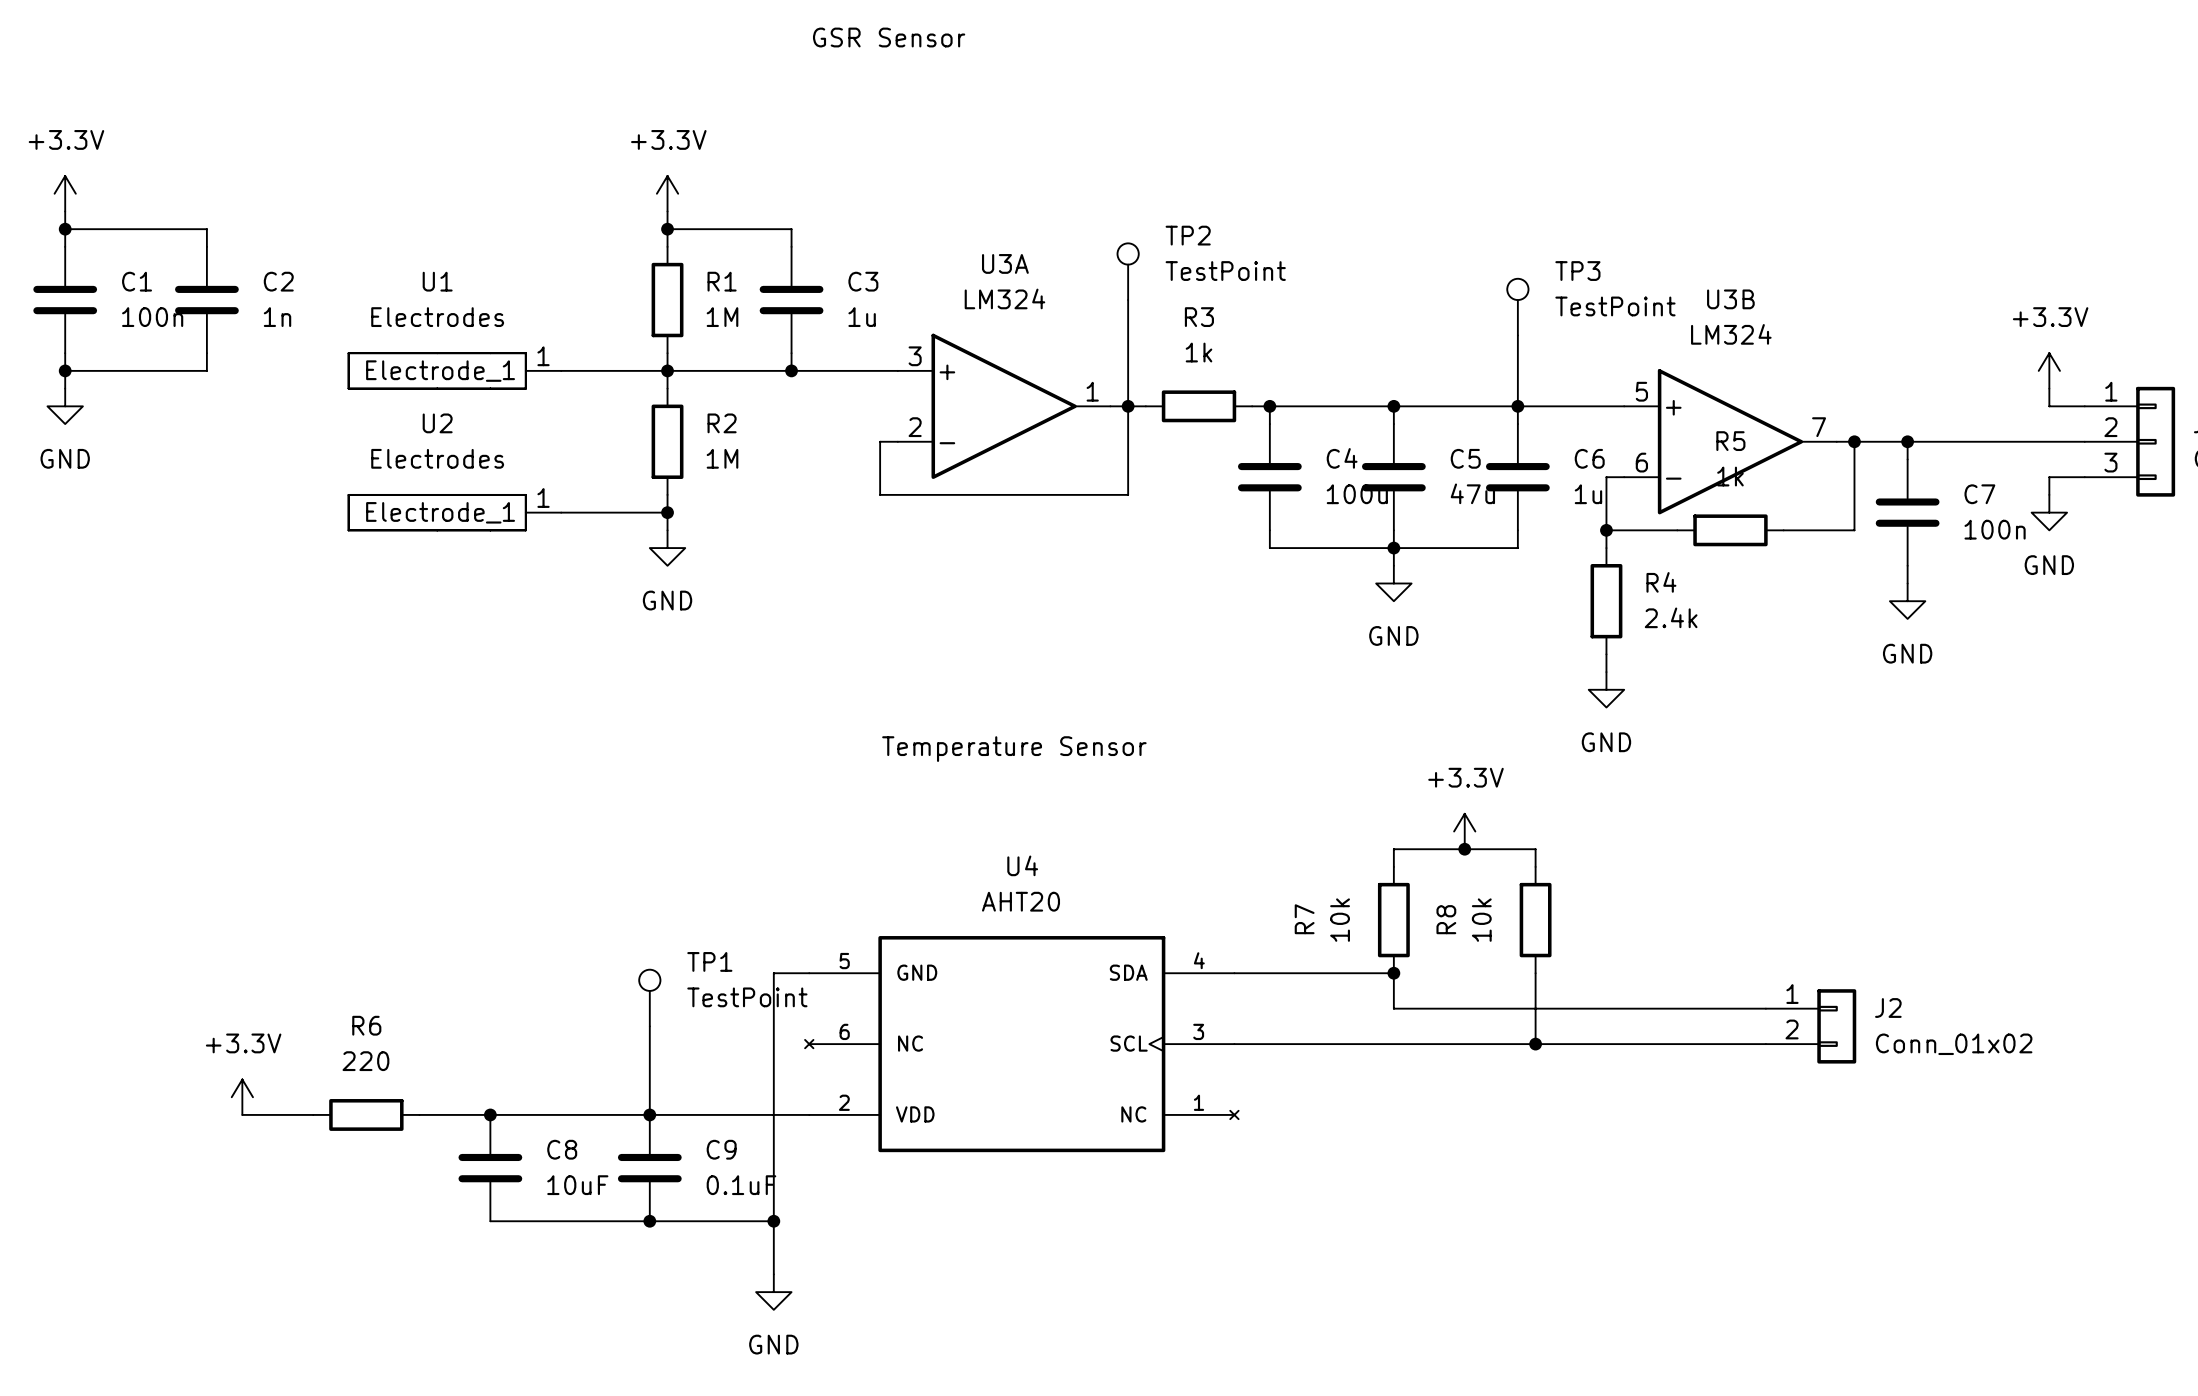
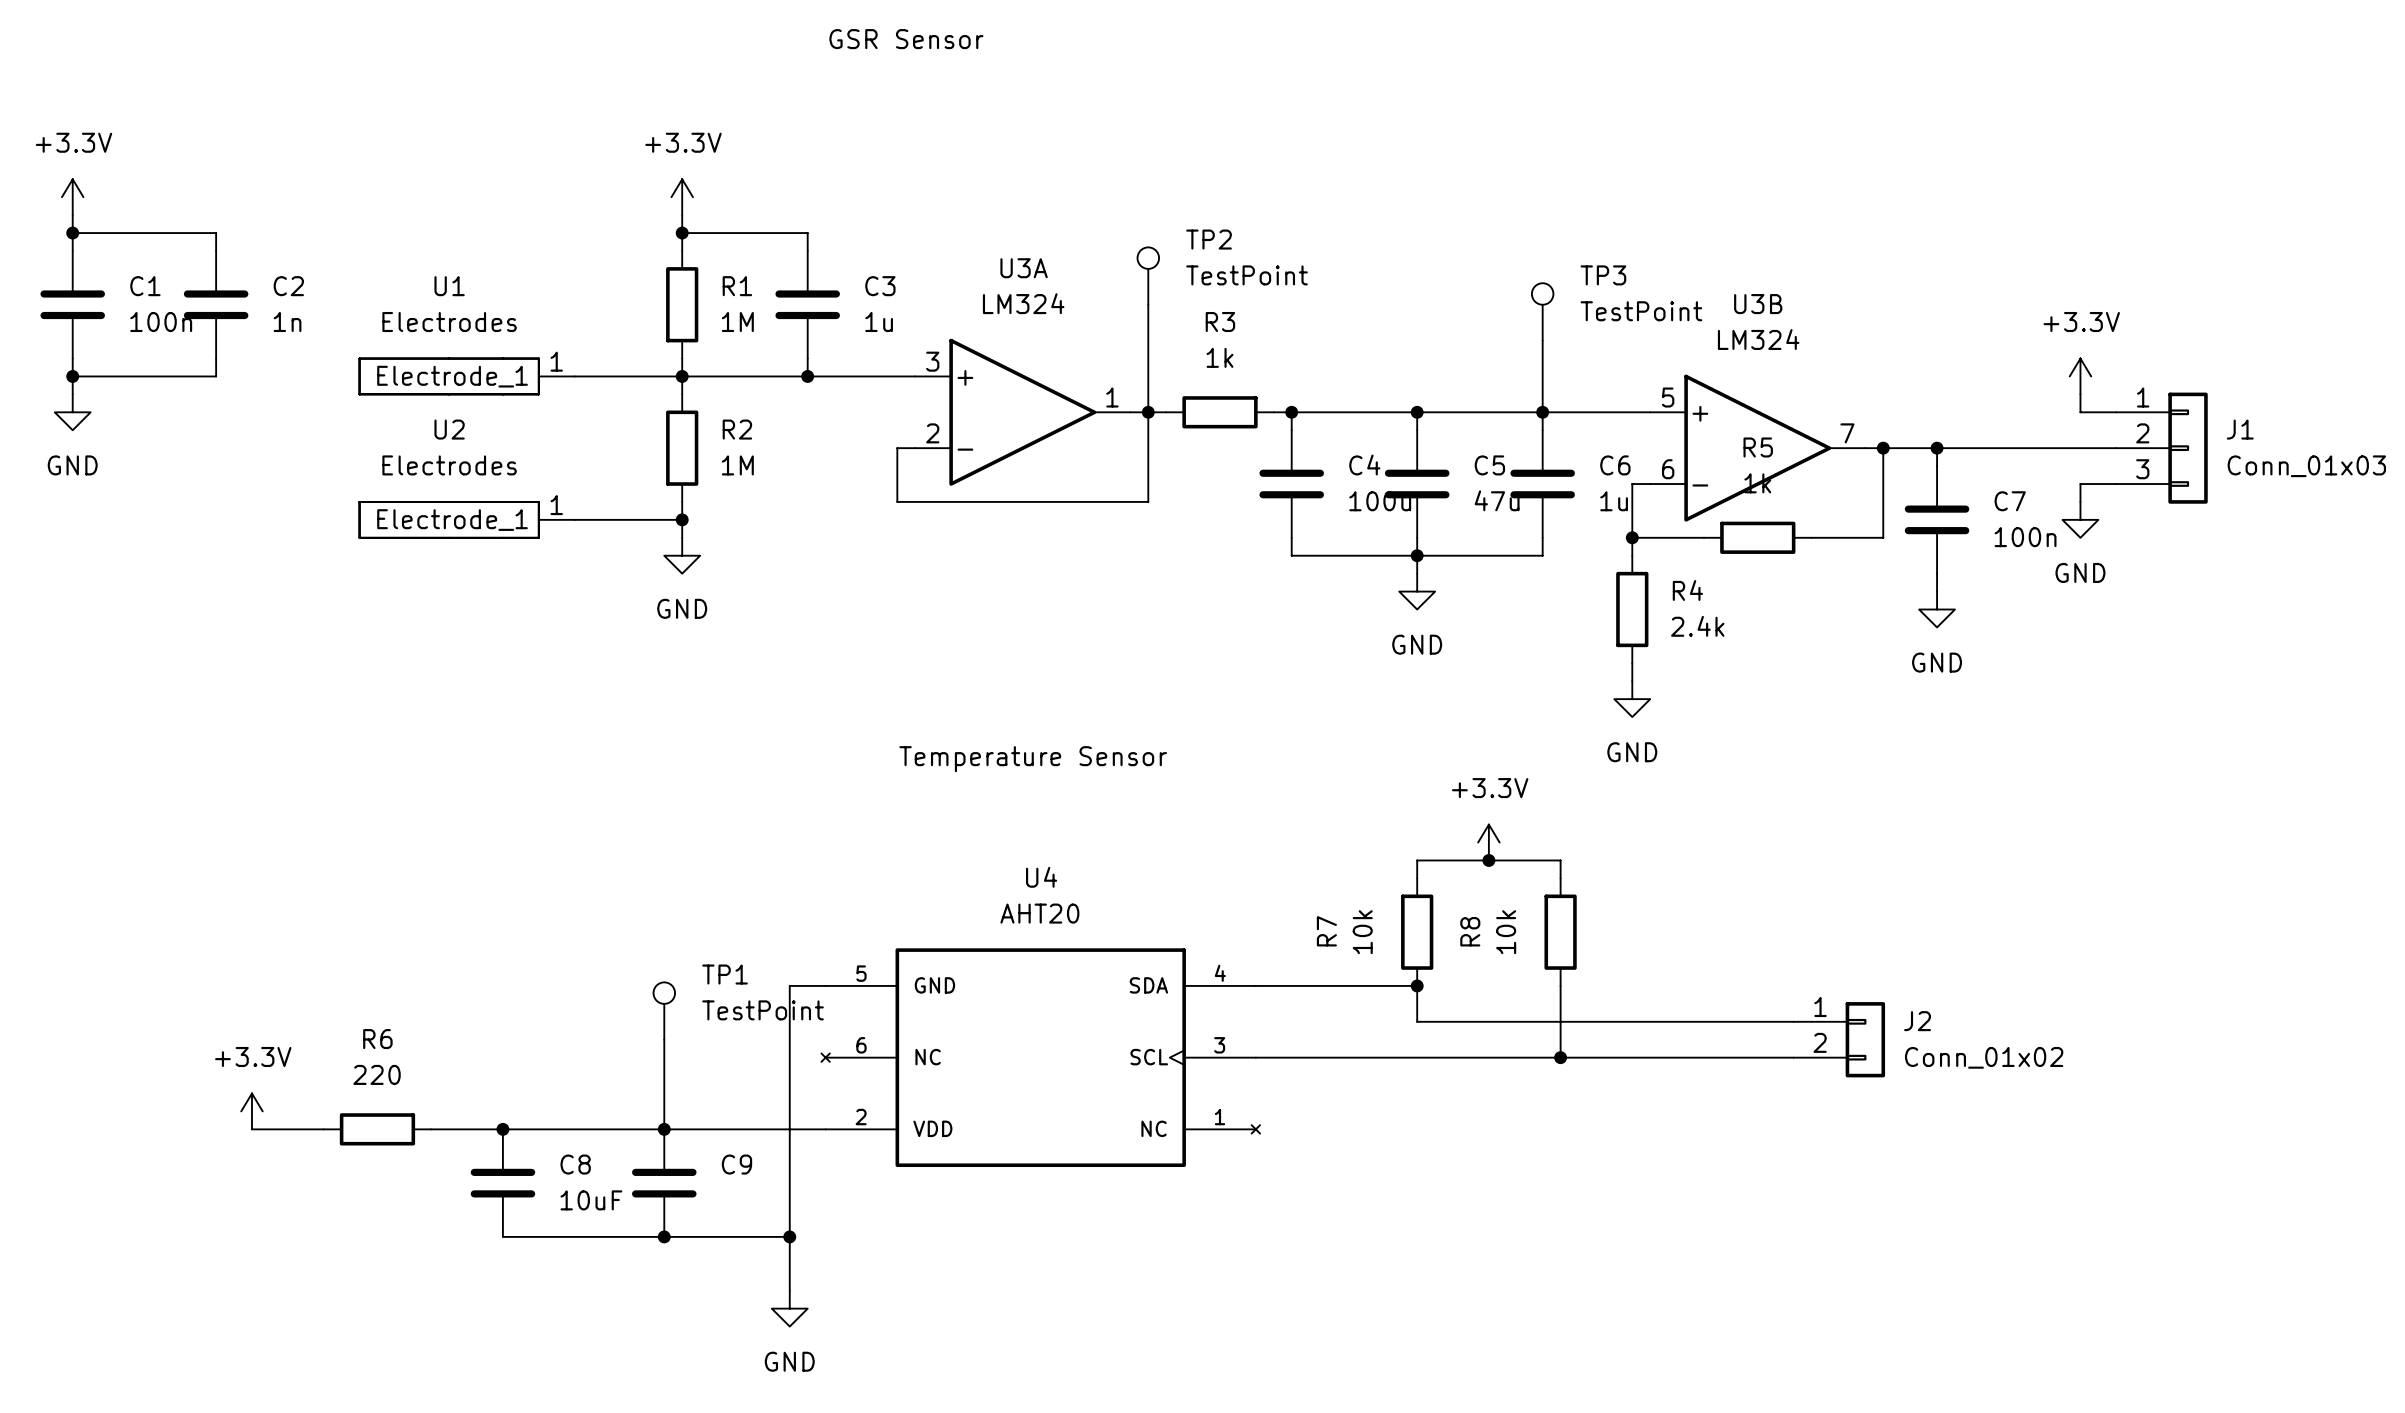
C9 value: 0.1uF (741, 1185) -> none

